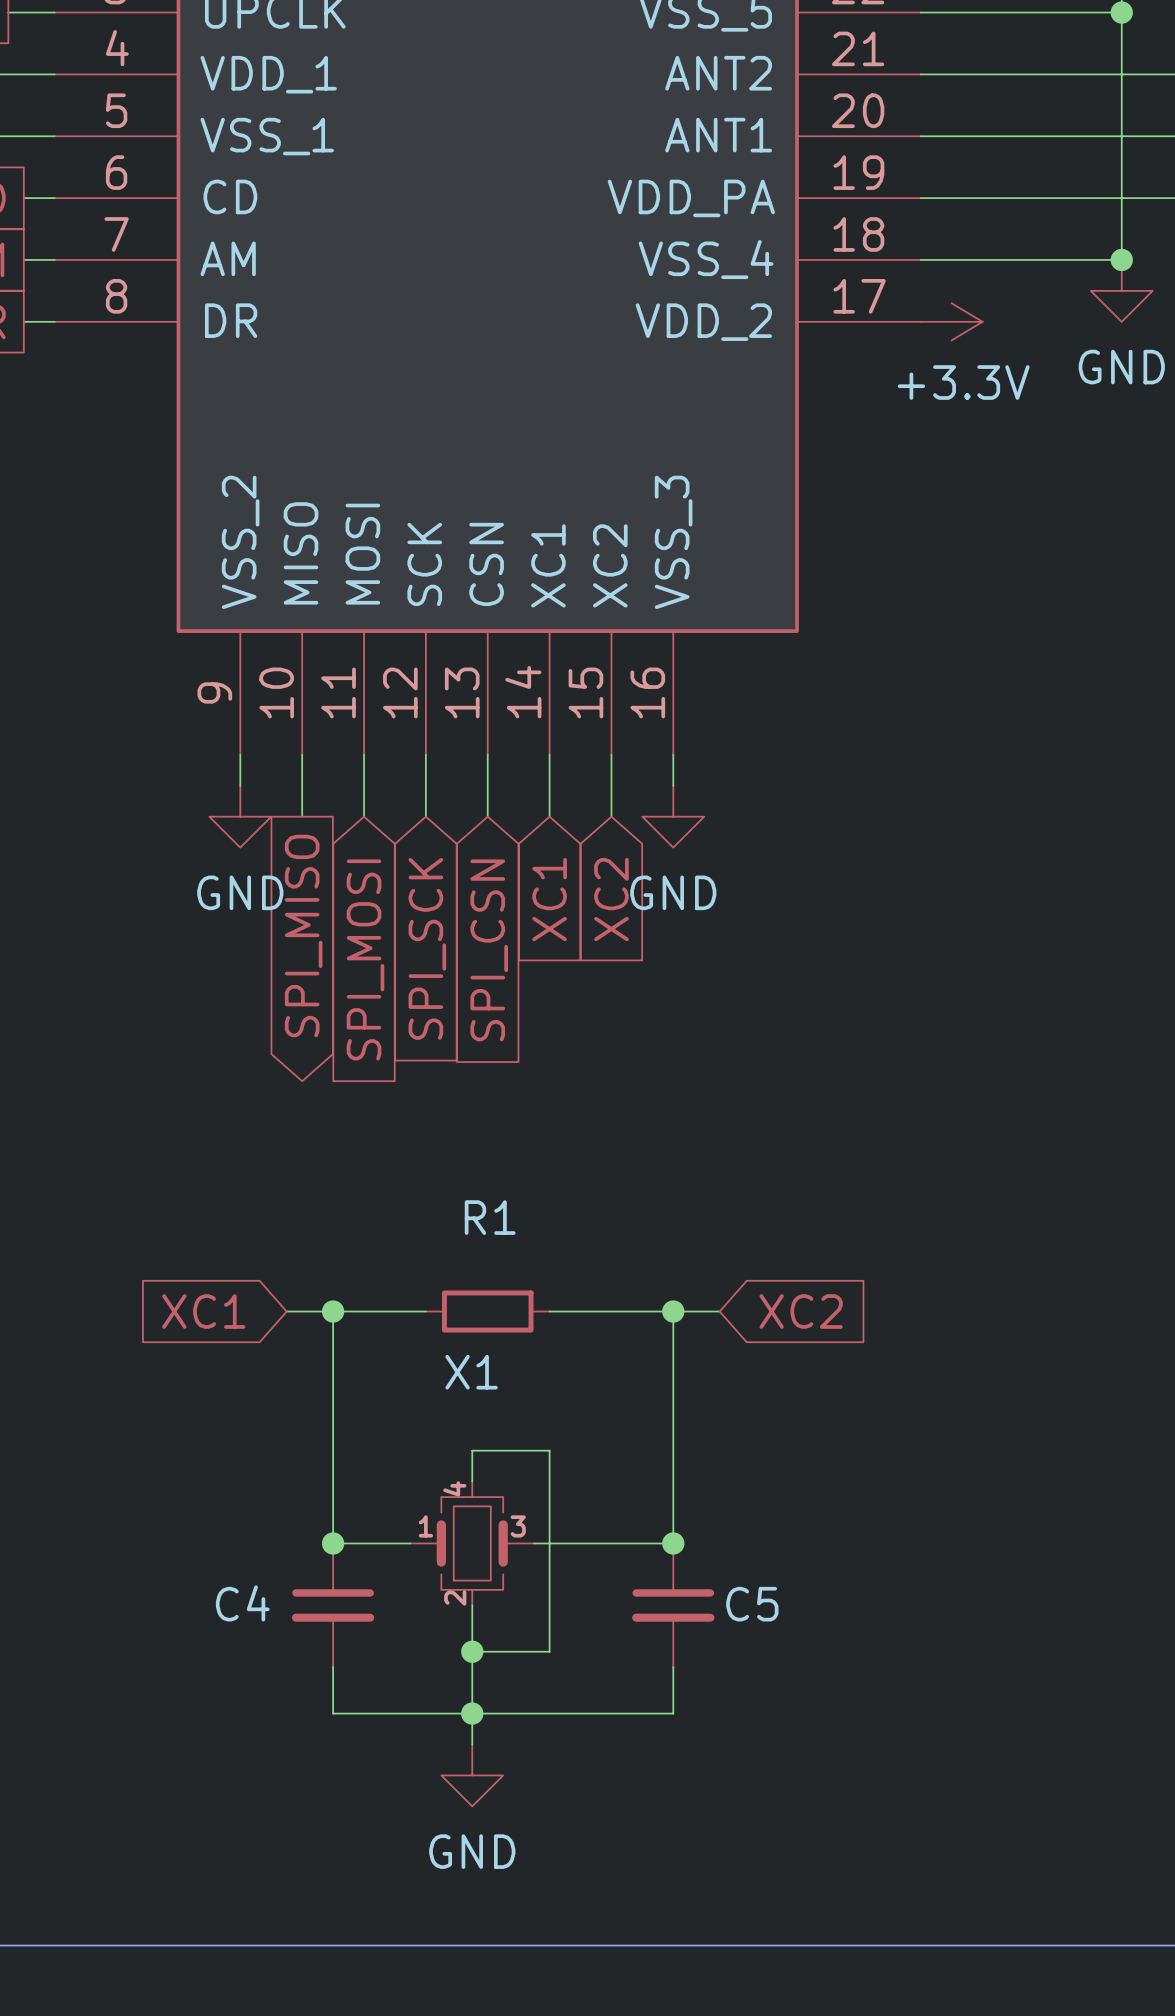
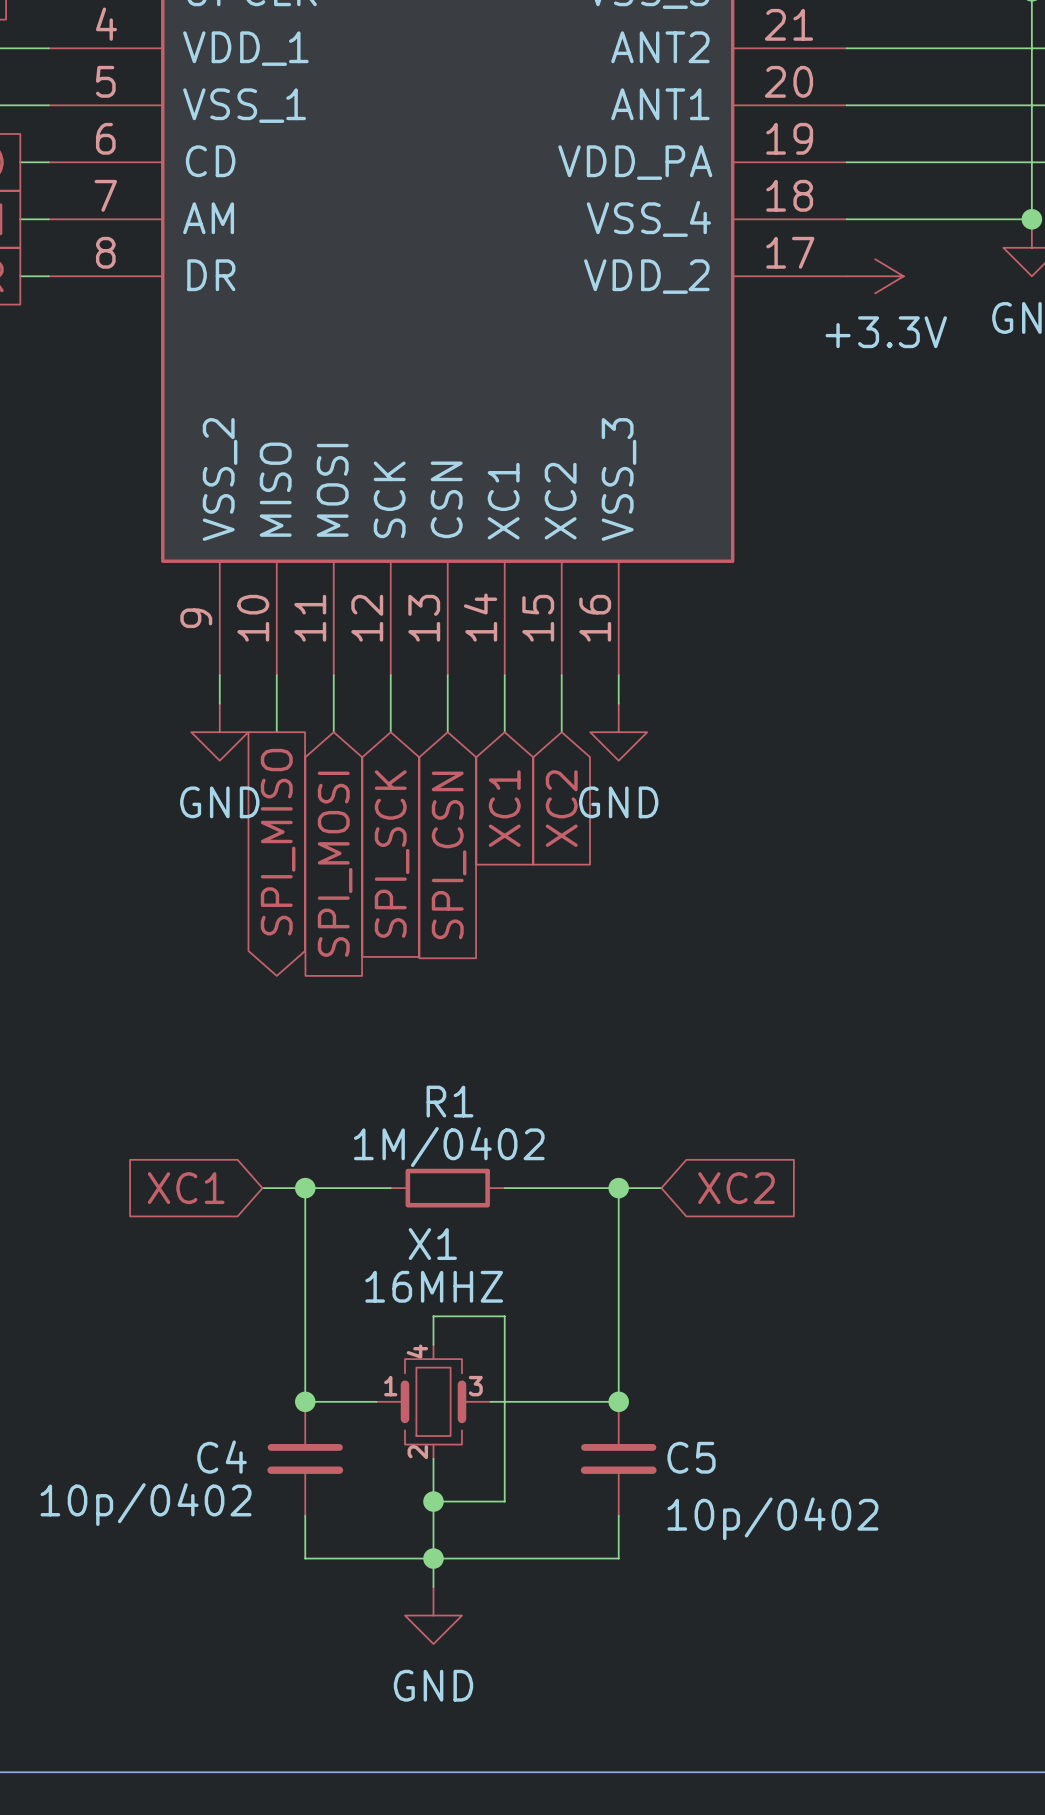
R1 value: none -> 1M/0402 (449, 1147)
X1 value: none -> 16MHZ (434, 1286)
C4 value: none -> 10p/0402 (146, 1504)
C5 value: none -> 10p/0402 (772, 1518)

